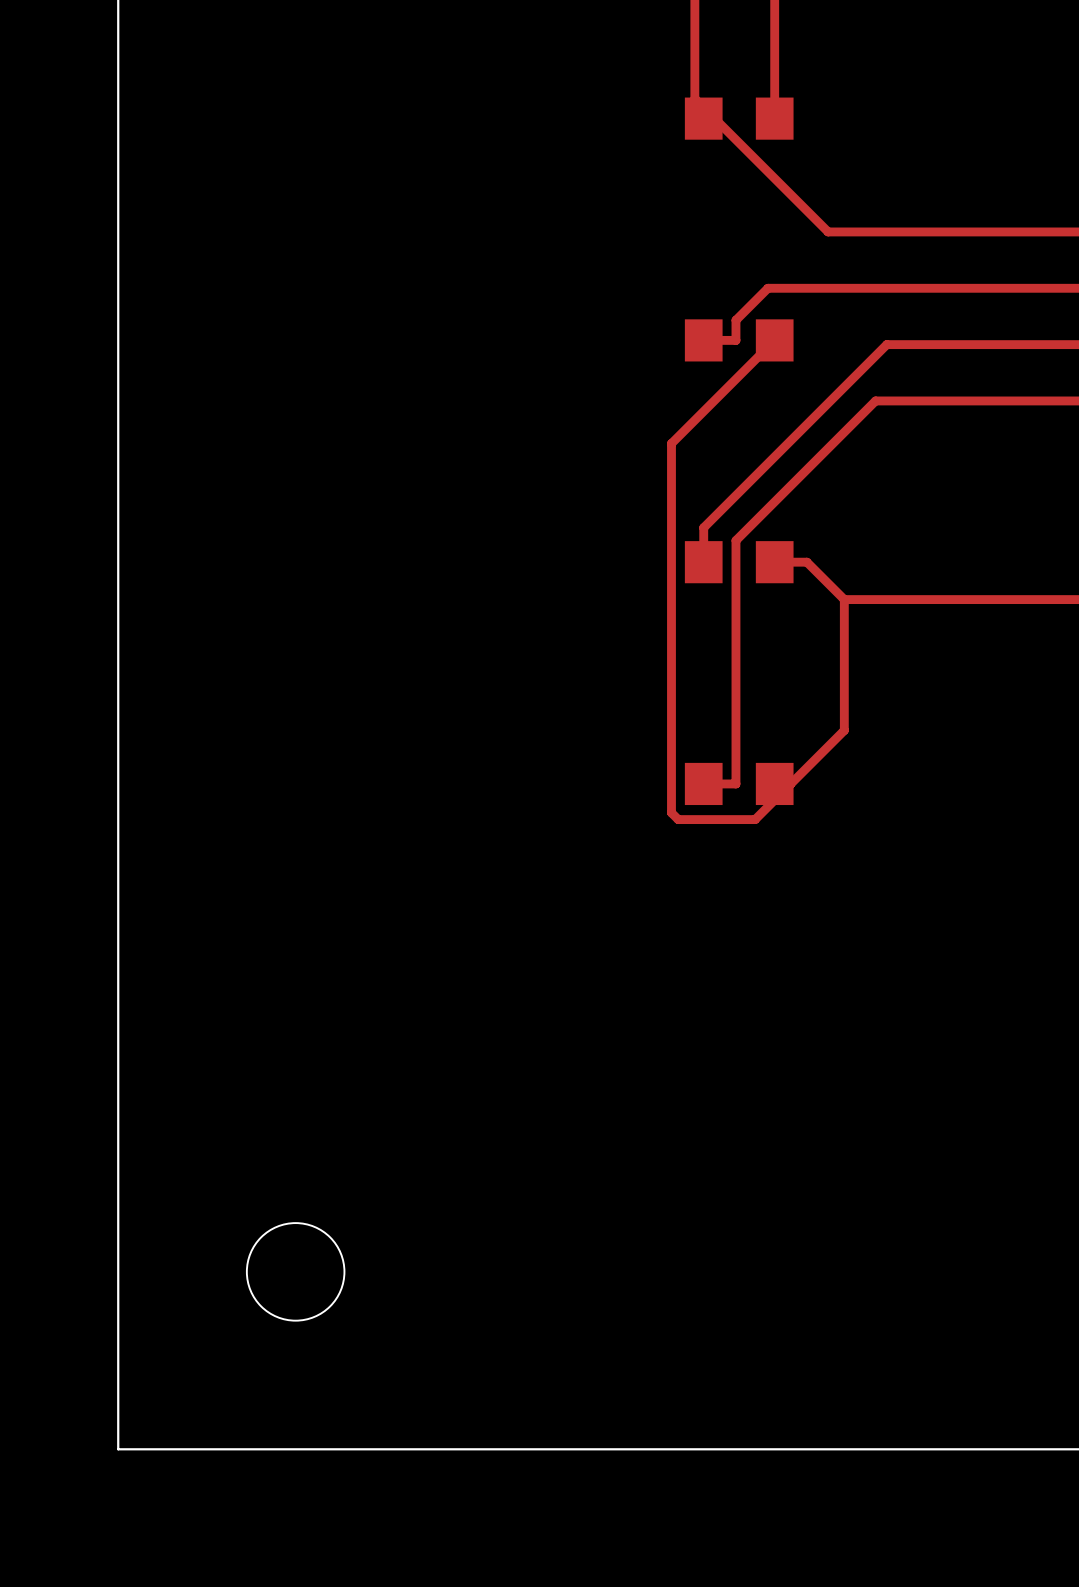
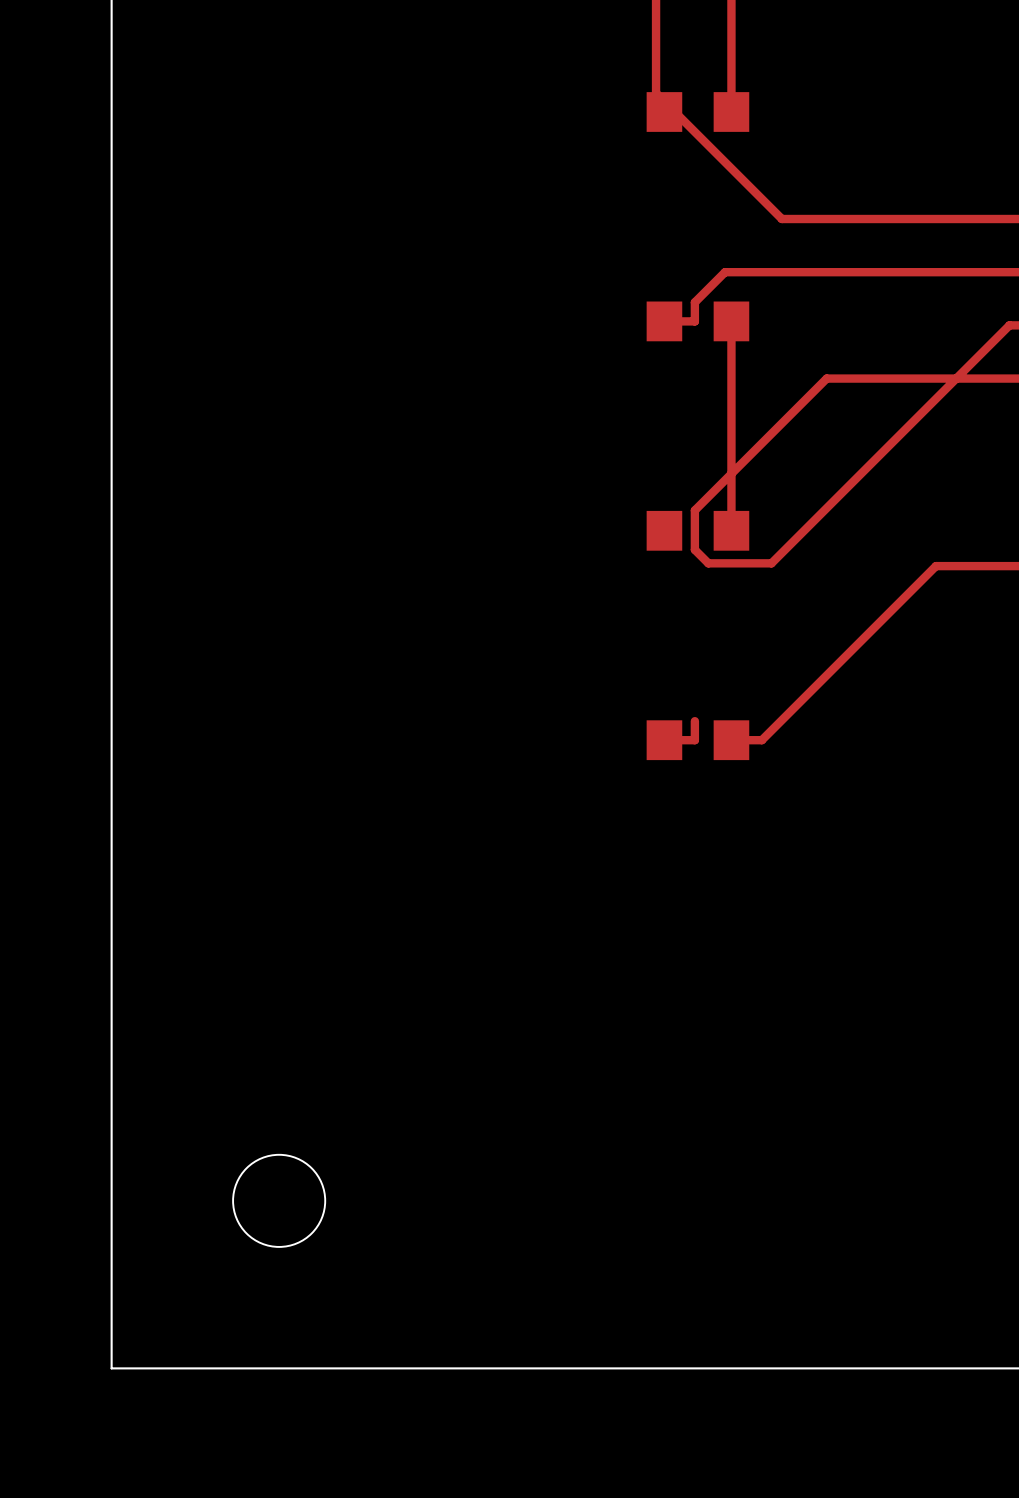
track: (774, 340) (671, 443) (671, 812) (678, 819) (755, 819) (844, 730) (844, 599) -> (731, 321) (731, 530)
track: (1069, 344) (886, 344) (703, 527) (703, 562) -> (1009, 325) (771, 563) (708, 563) (694, 549)
track: (774, 562) (806, 562) (844, 599) -> none
track: (735, 582) (735, 763) -> none
track: (844, 599) (991, 599) -> (746, 740) (761, 740) (935, 566)

